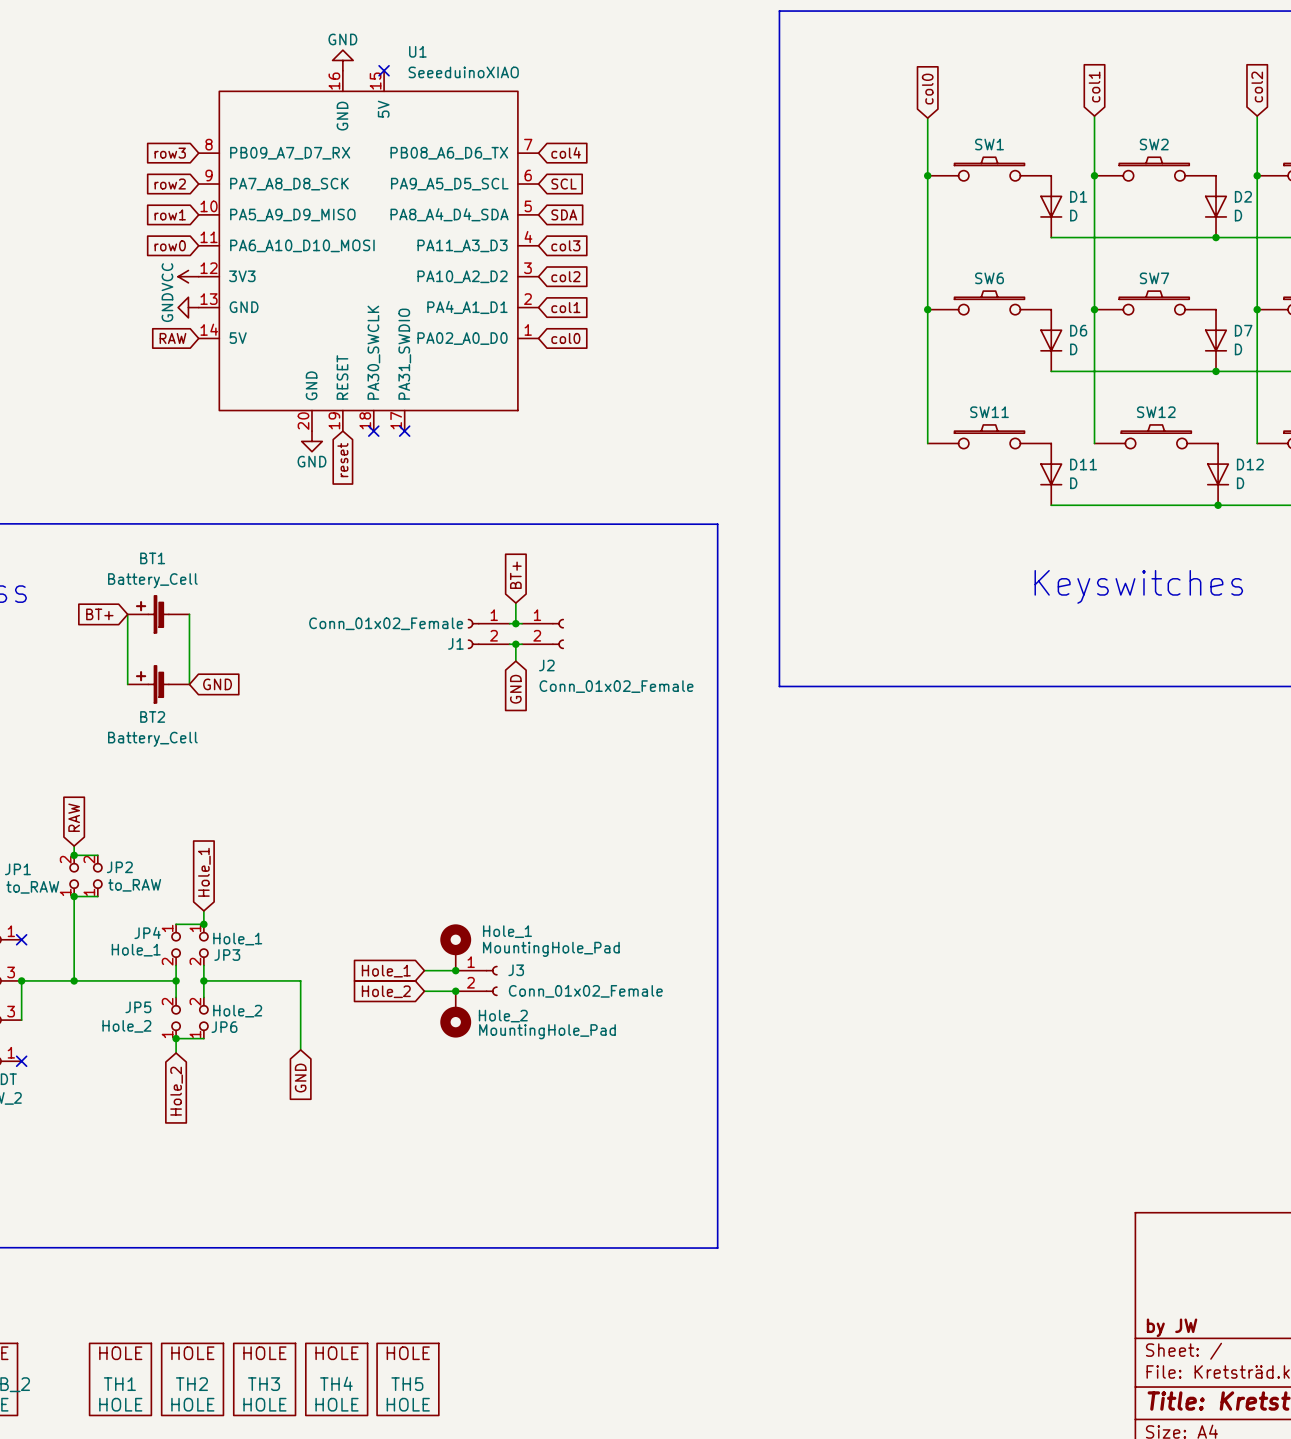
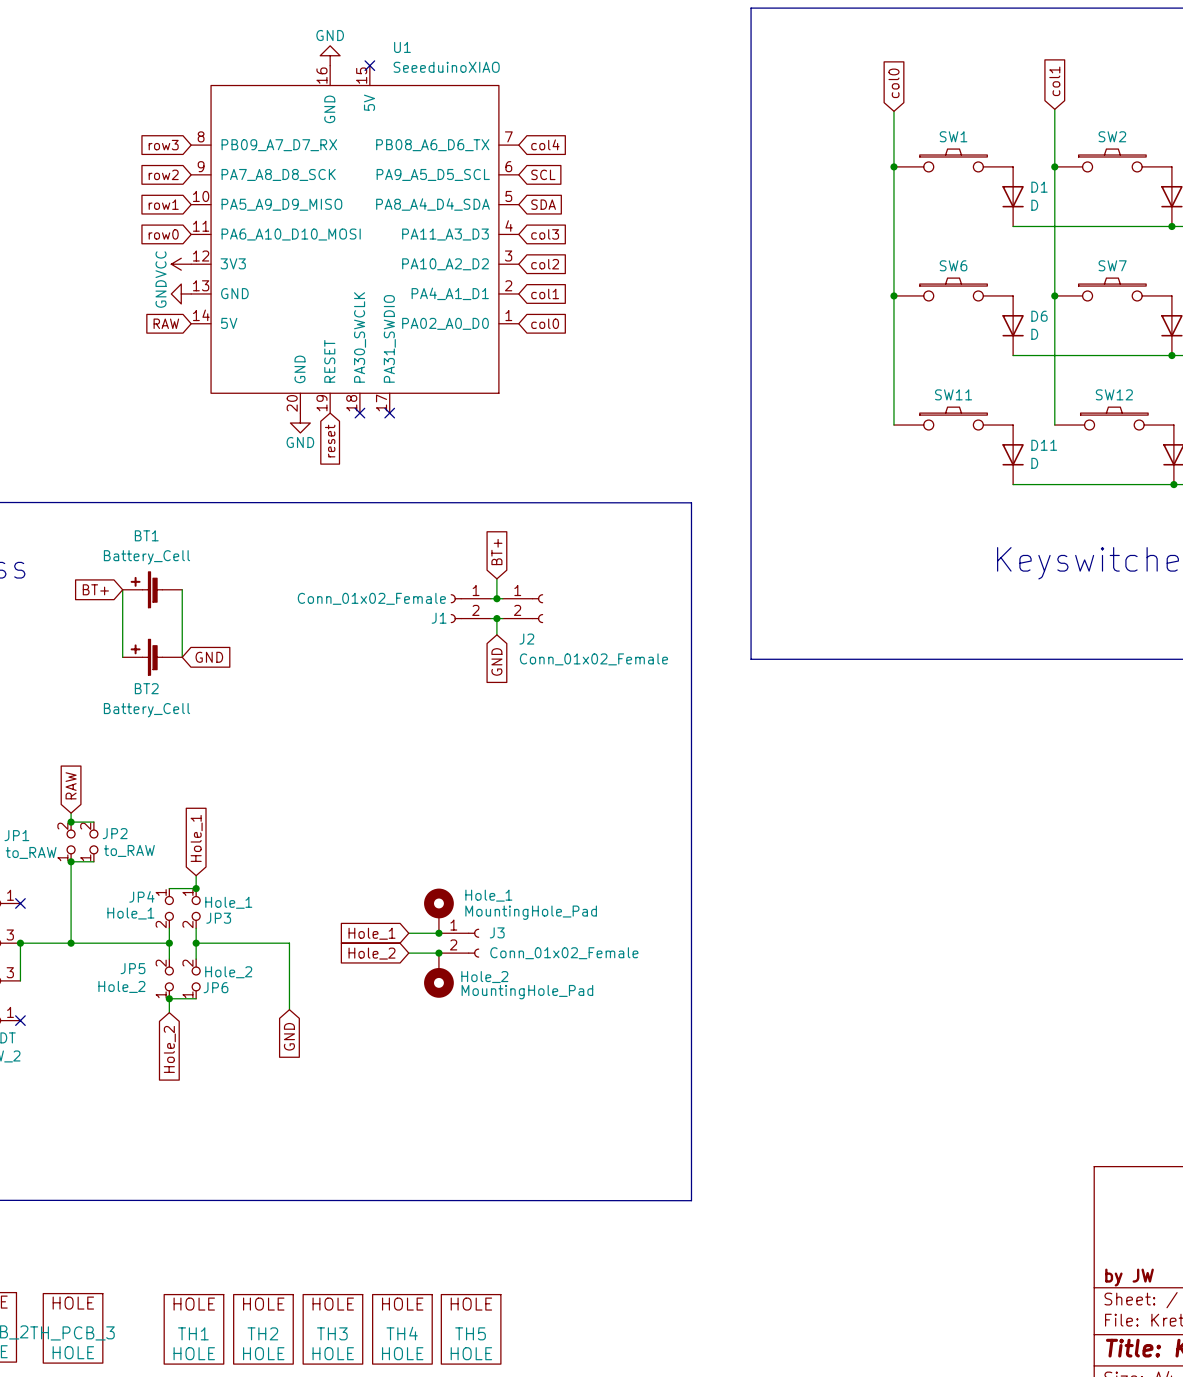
TH1 position: (120, 1379) -> (193, 1329)
TH2 position: (192, 1379) -> (263, 1329)
TH3 position: (264, 1379) -> (332, 1329)
TH4 position: (336, 1379) -> (402, 1329)
TH5 position: (407, 1379) -> (471, 1329)
TH_PCB_3: none -> HOLE (73, 1328)

